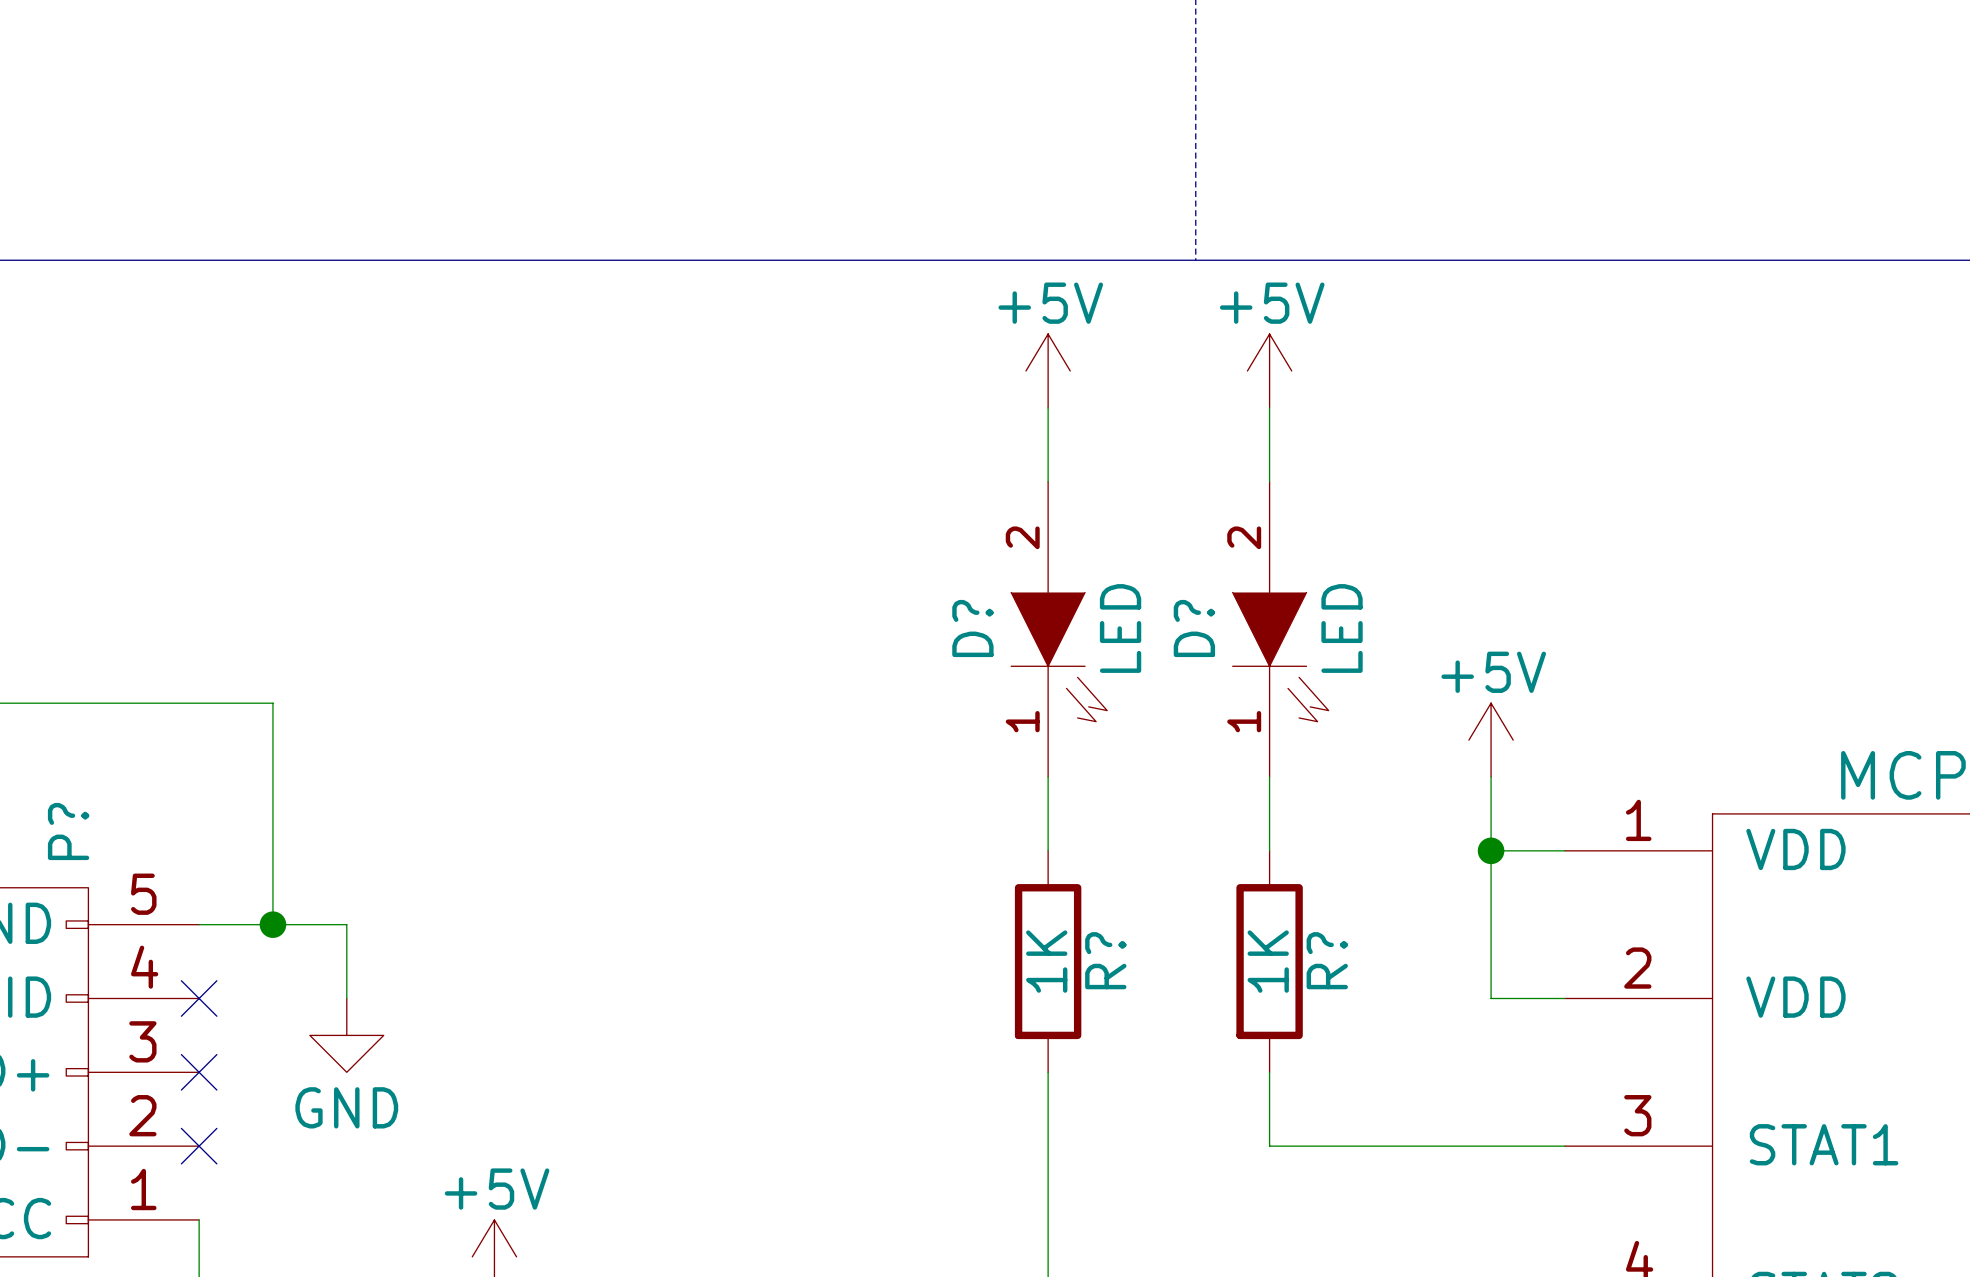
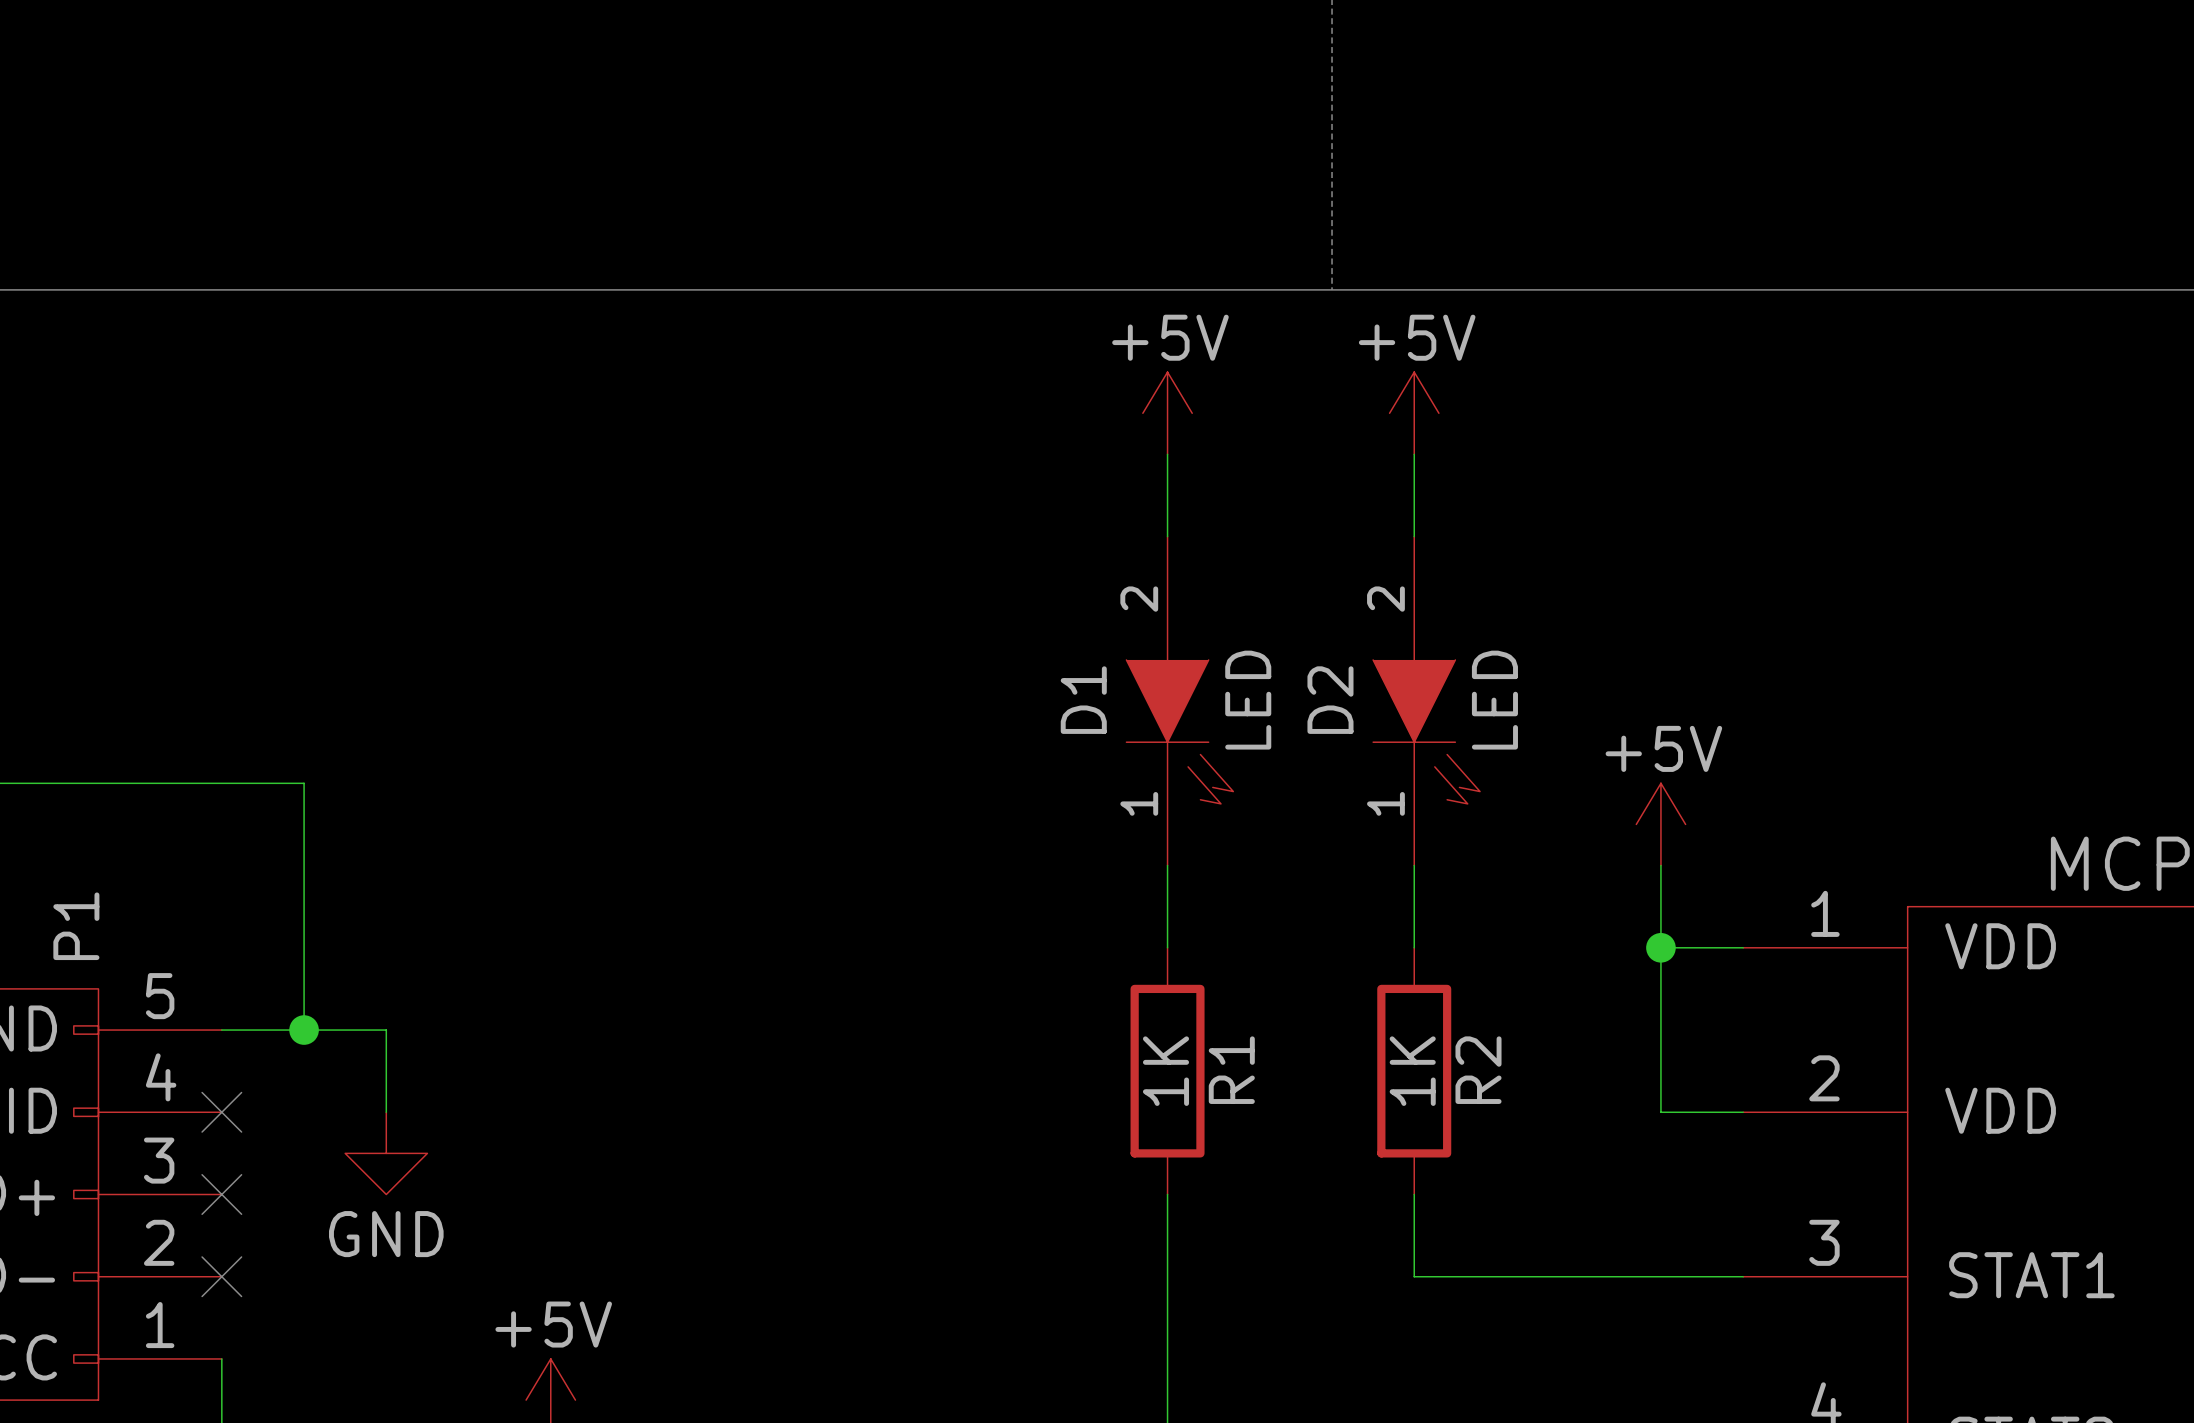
D? name: D? (972, 628) -> D1 (1083, 700)
D? name: D? (1194, 628) -> D2 (1330, 700)
P? name: P? (68, 831) -> P1 (76, 926)
R? name: R? (1105, 960) -> R1 (1231, 1070)
R? name: R? (1327, 960) -> R2 (1478, 1070)

